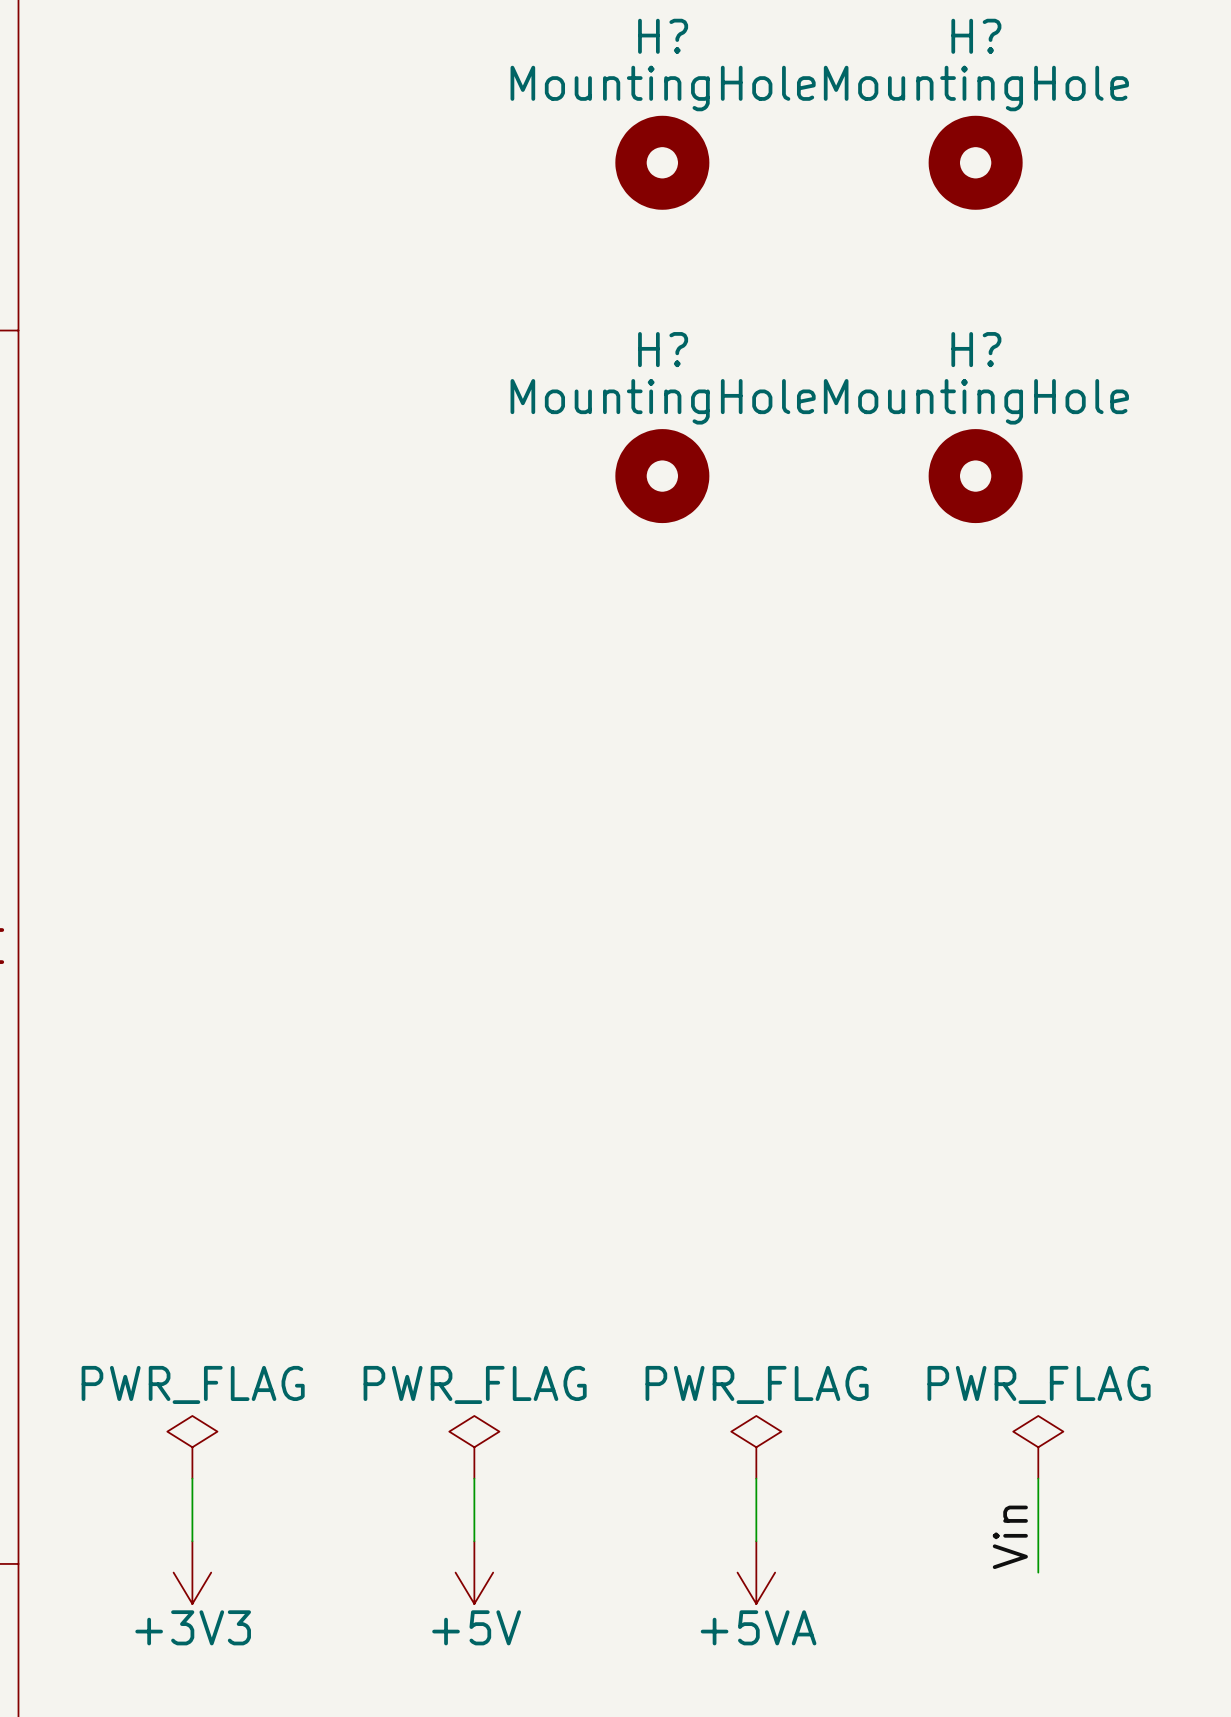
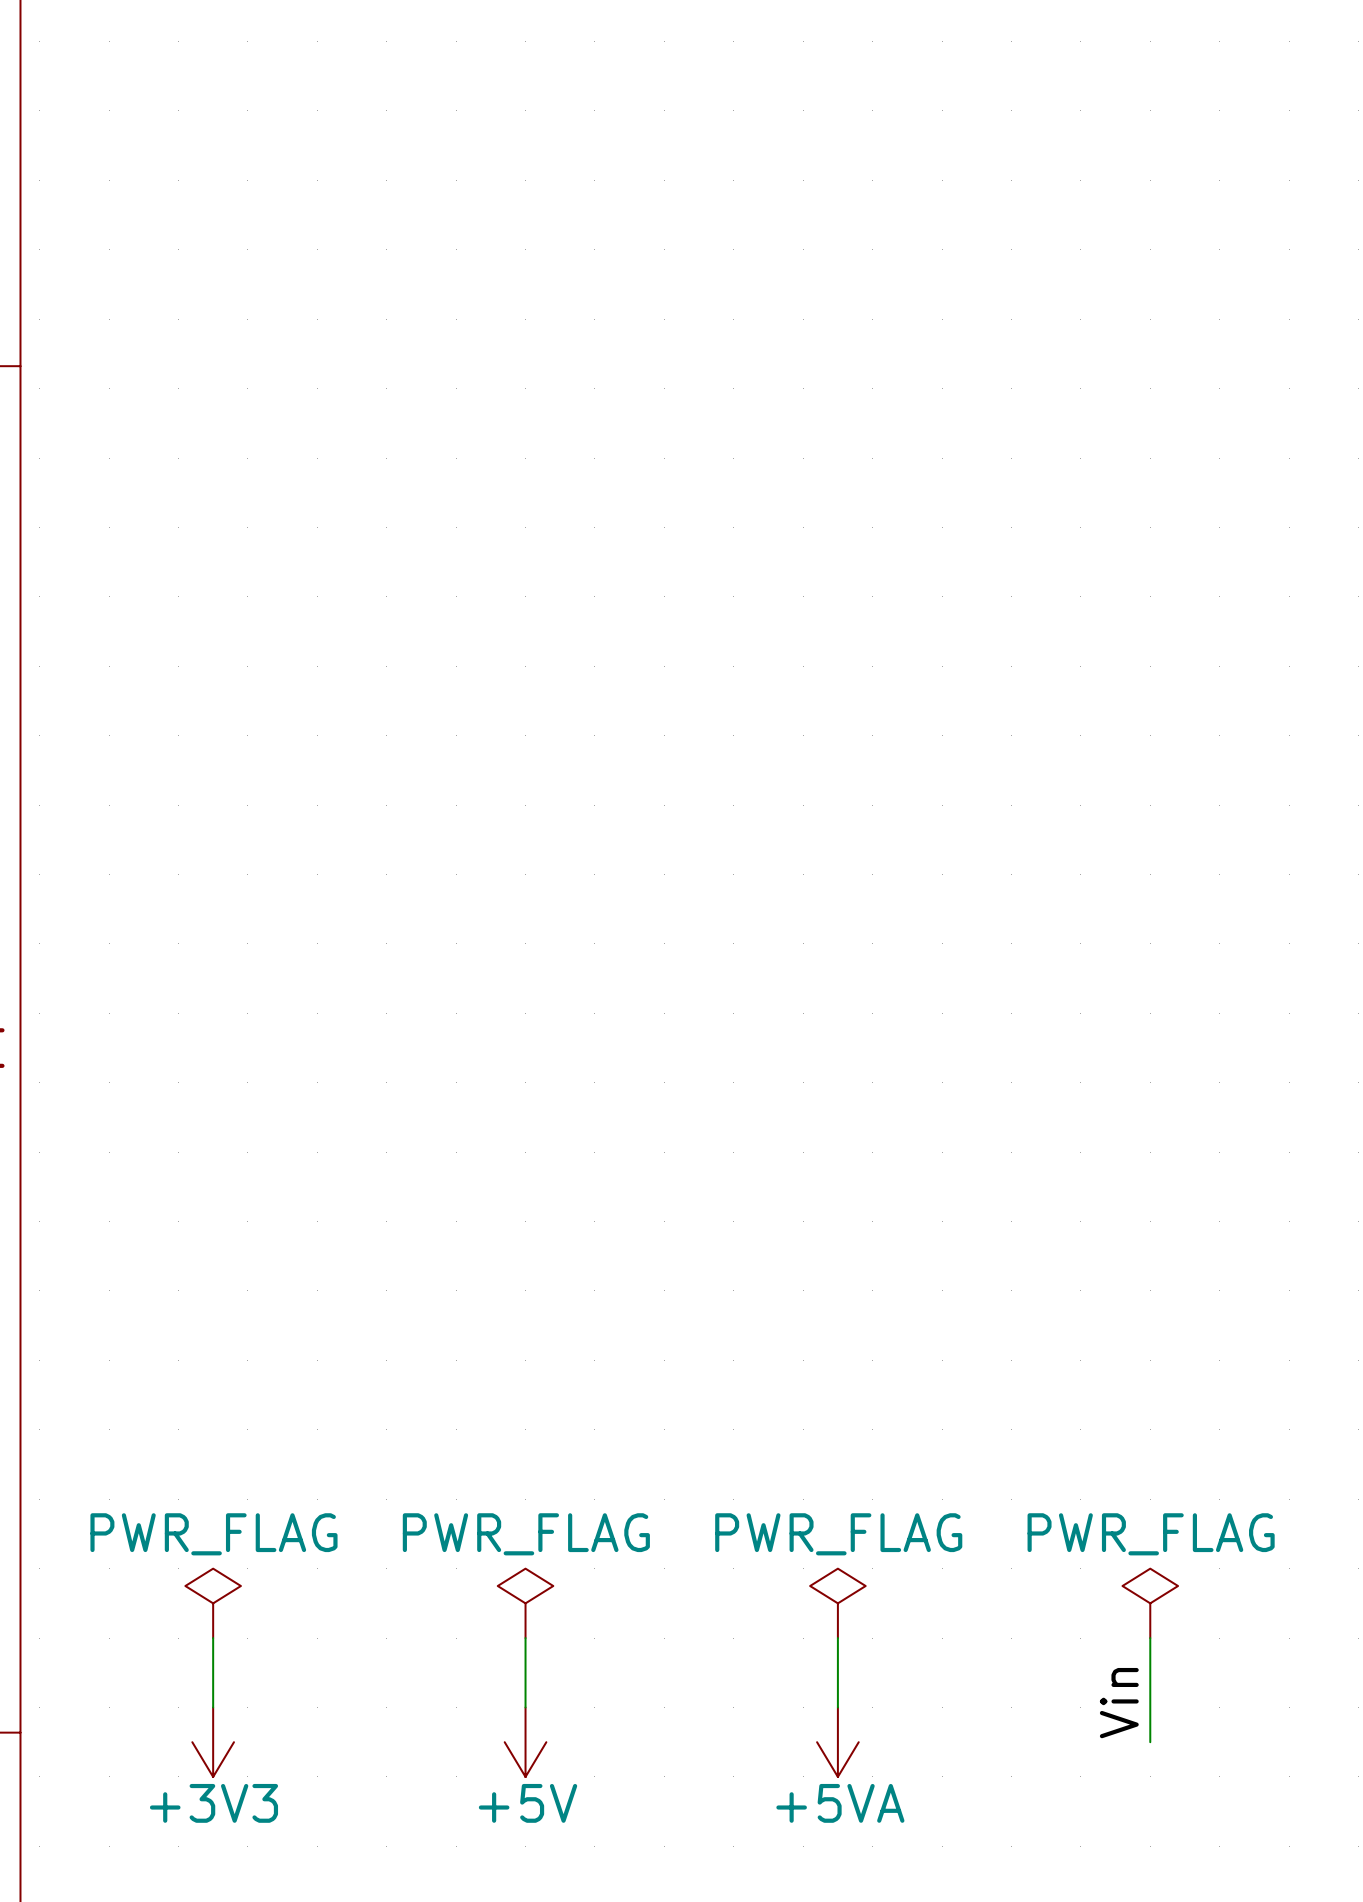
H?: MountingHole (662, 162) -> none
H?: MountingHole (975, 162) -> none
H?: MountingHole (662, 476) -> none
H?: MountingHole (975, 476) -> none

